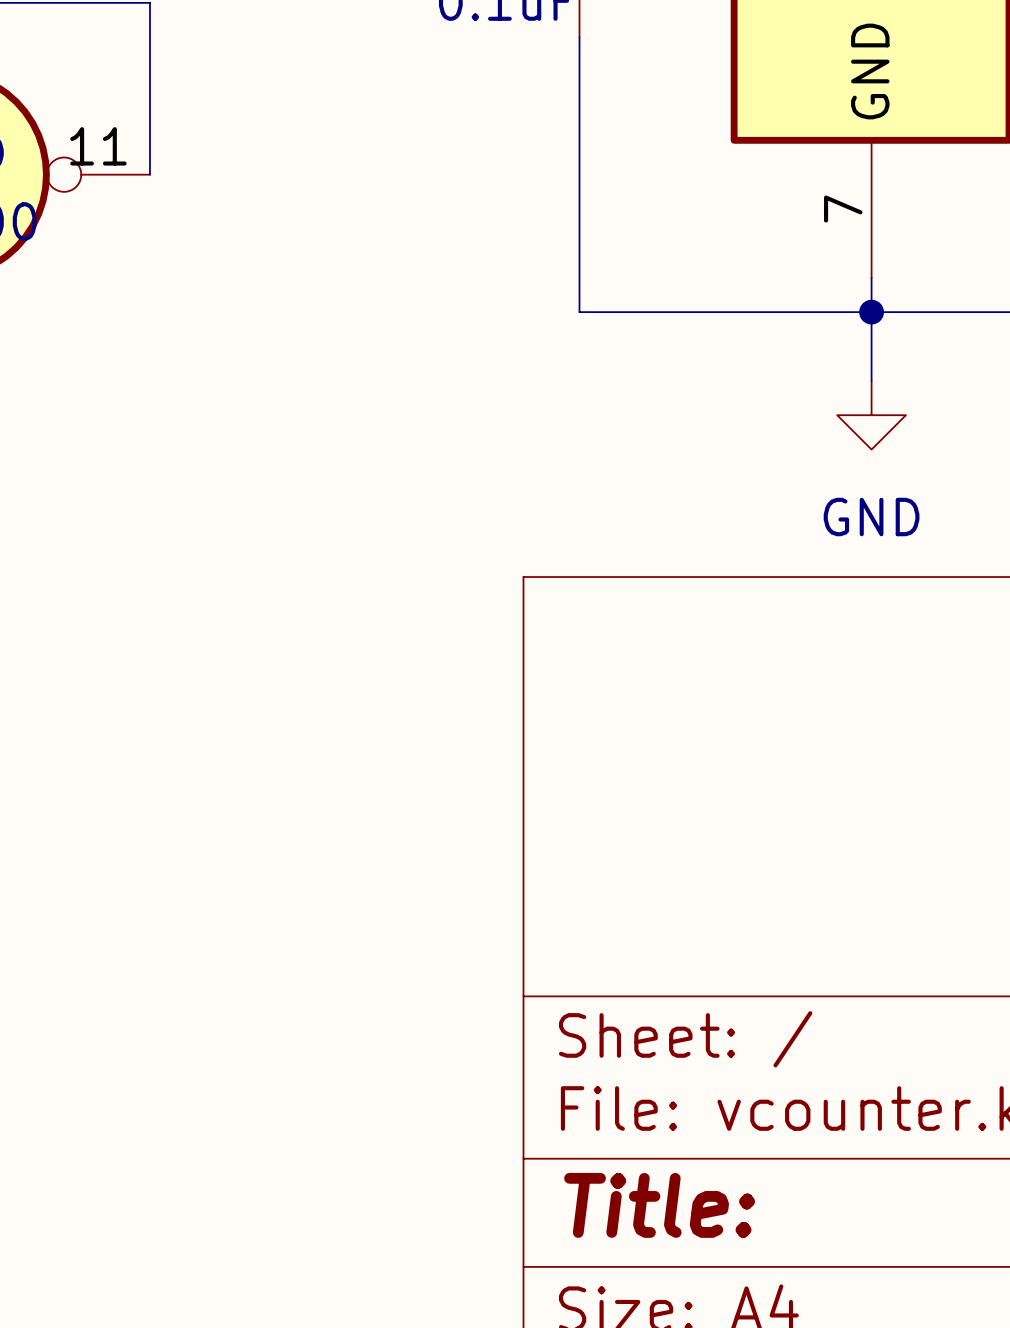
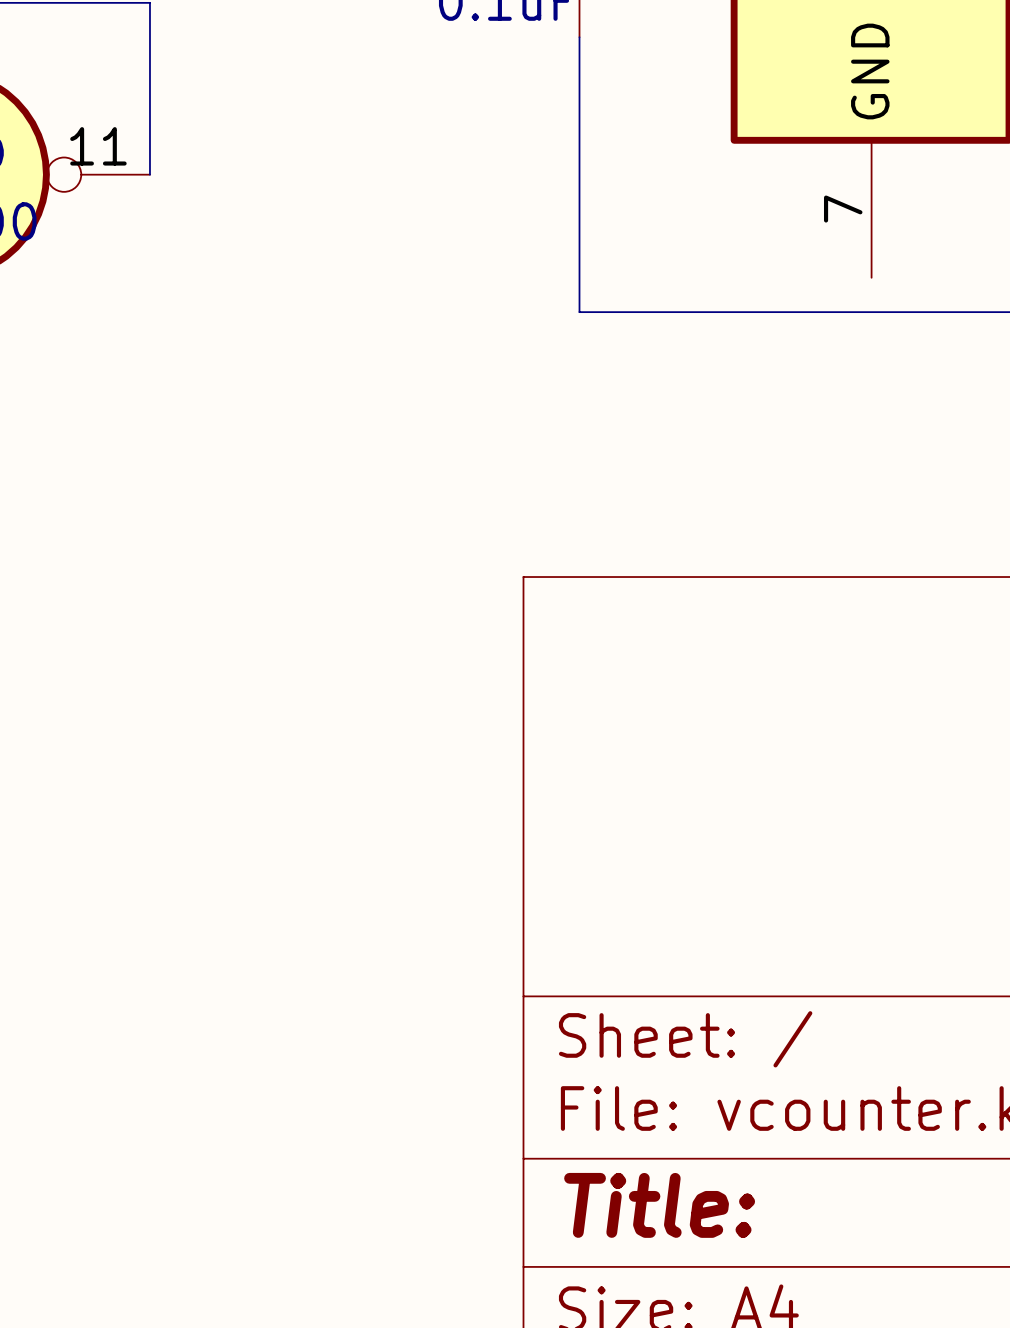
wire: (871, 277) (871, 380) -> none
junction: (871, 312) -> none
power symbol: GND (871, 415) -> none

